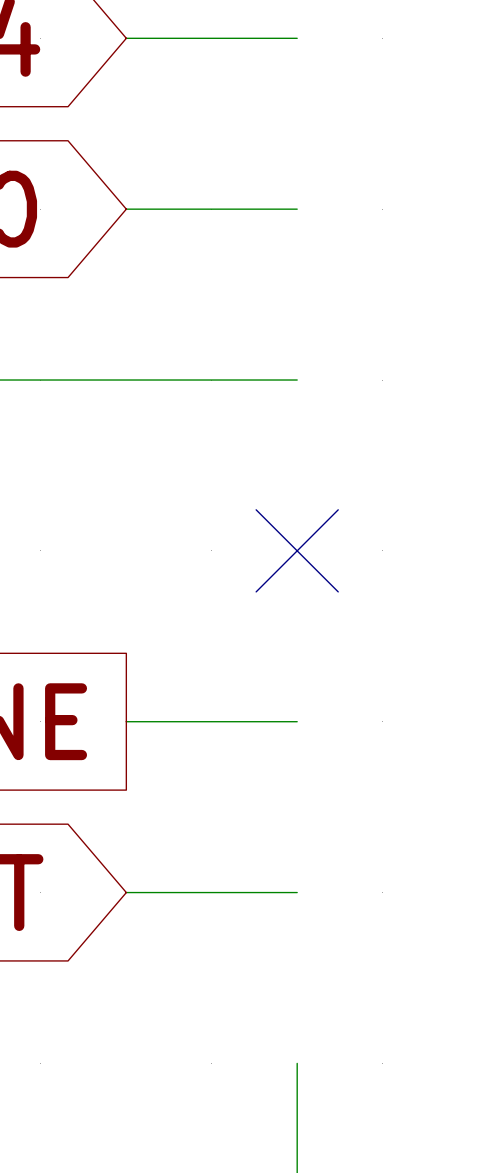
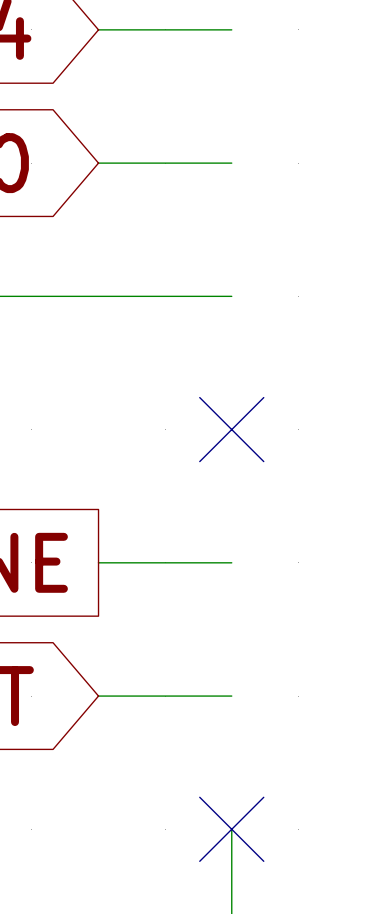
no-connect mark: none -> (231, 829)

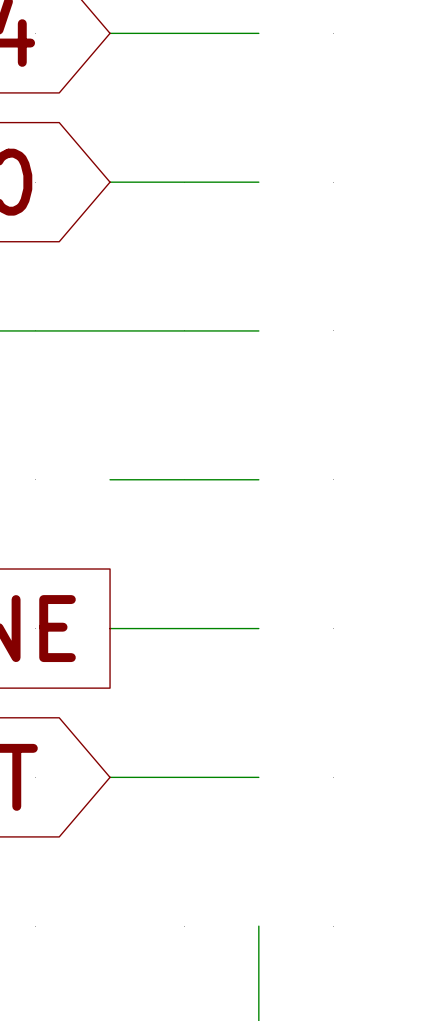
wire: none -> (110, 479) (258, 479)
no-connect mark: (231, 429) -> none
no-connect mark: (231, 829) -> none

